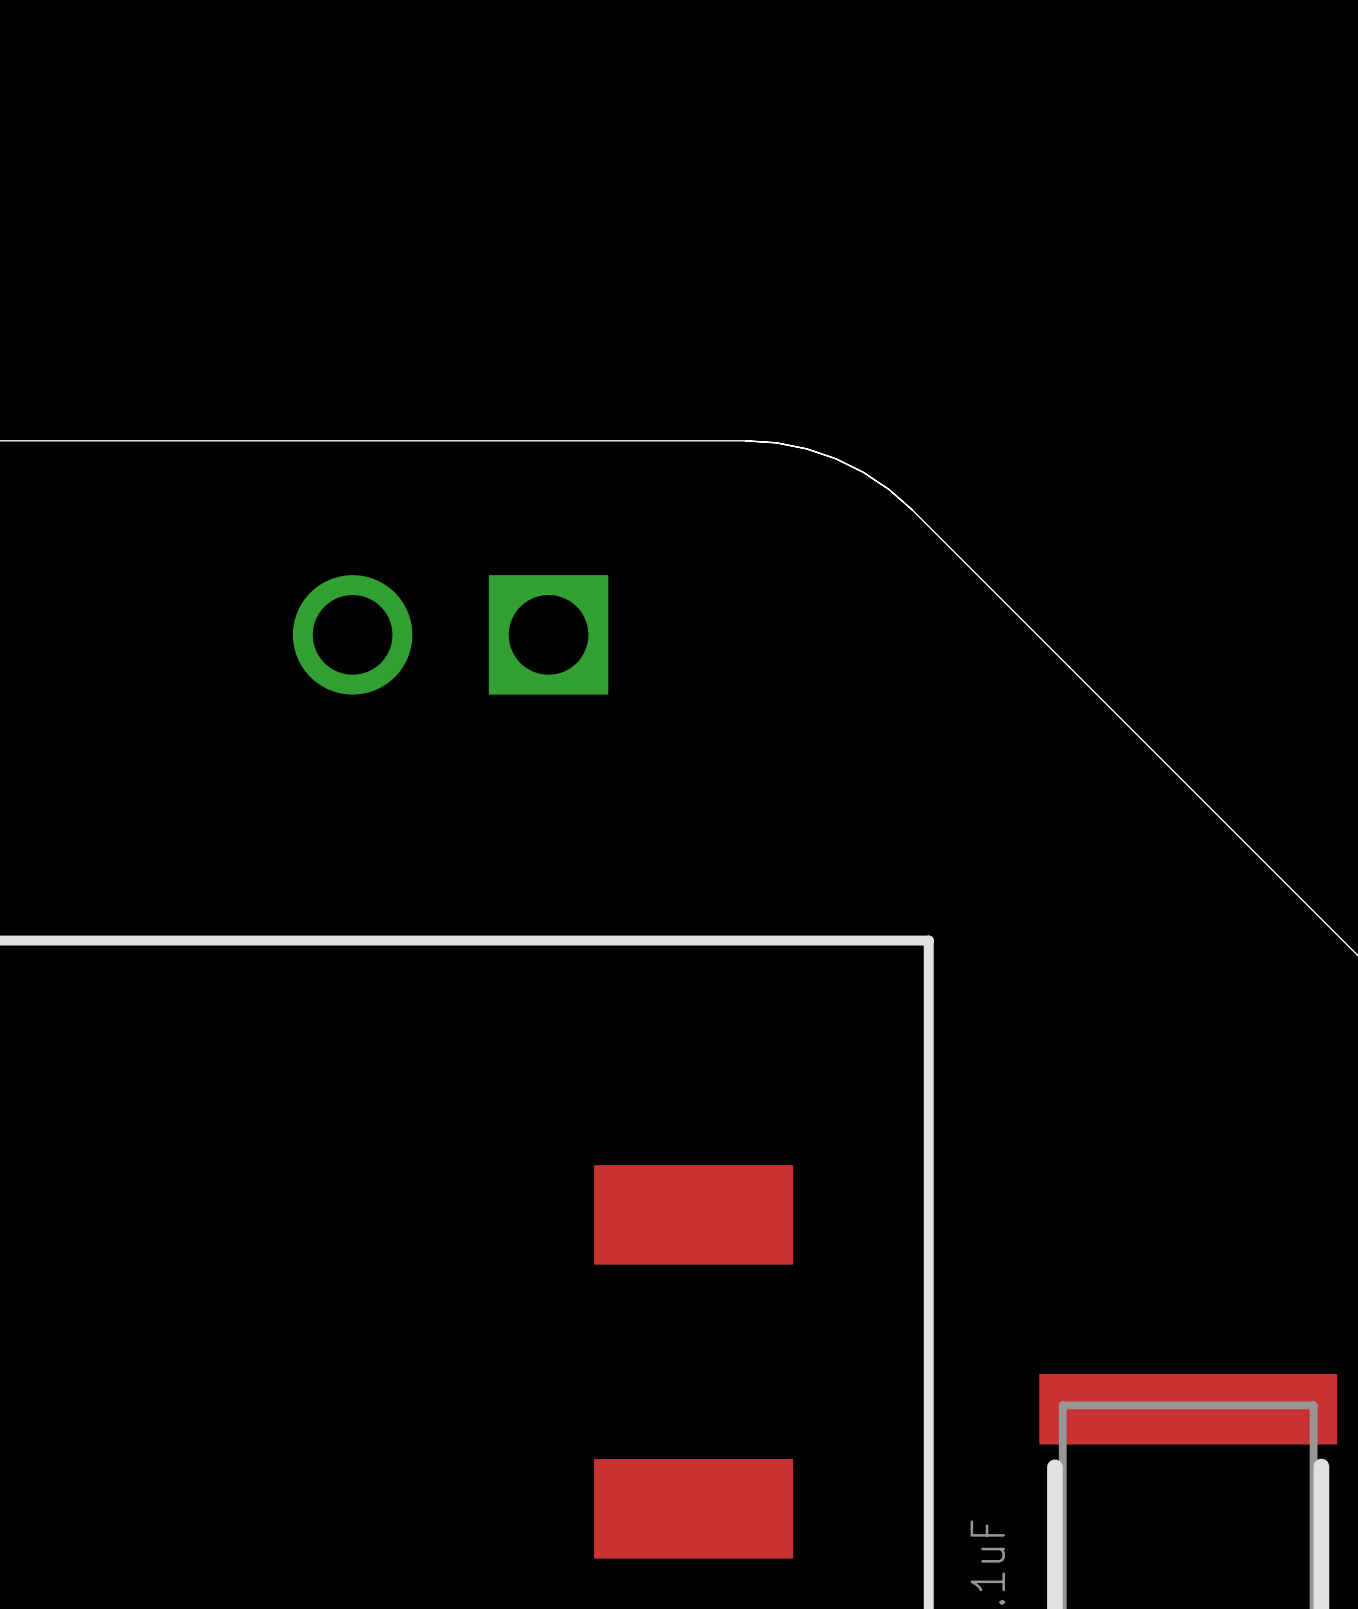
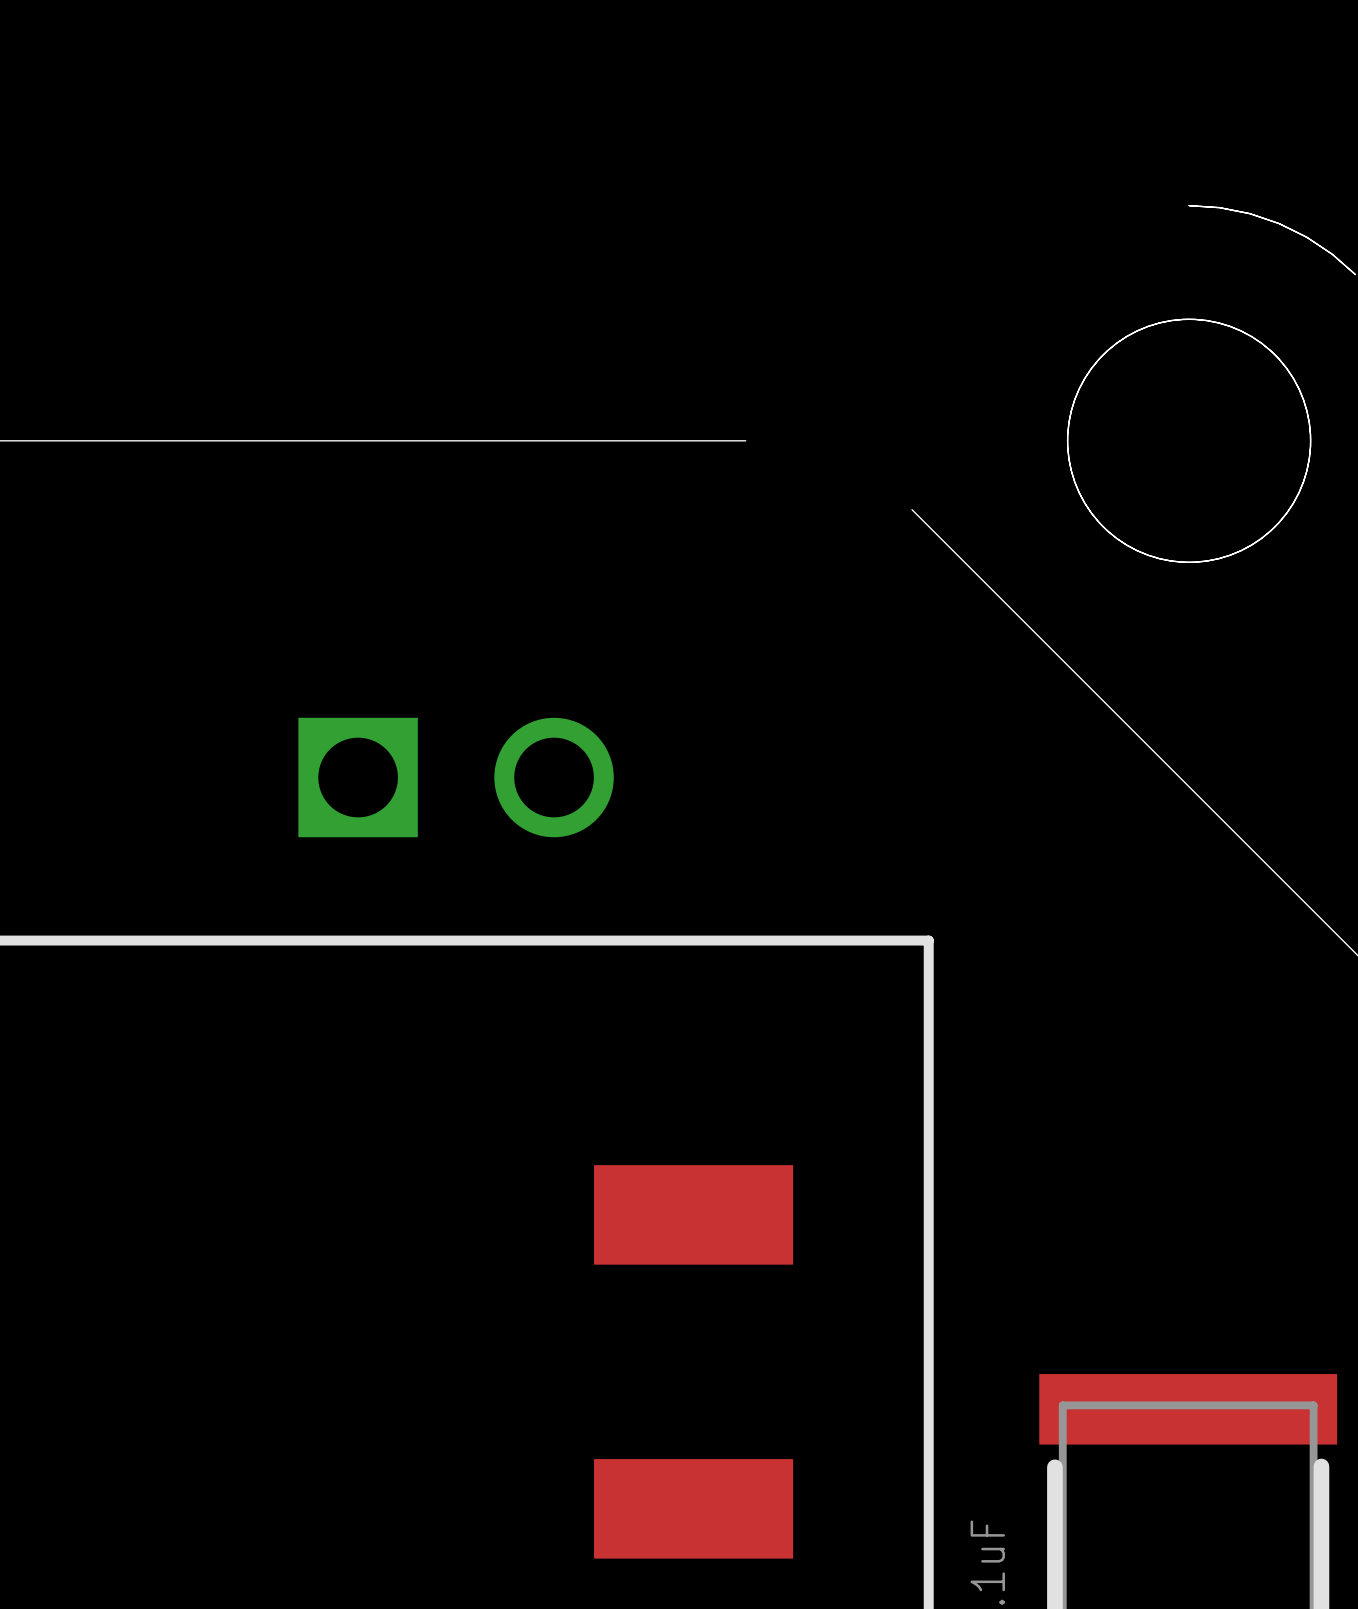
round board edge: none -> [1067, 318, 1311, 563]
board edge: (745, 440) (776, 442) (806, 448) (835, 458) (863, 472) (888, 489) (912, 509) (888, 489) (863, 472) (835, 458) (806, 448) (776, 442) (745, 440) -> (1189, 205) (1219, 207) (1249, 213) (1279, 223) (1306, 237) (1332, 254) (1355, 274) (1332, 254) (1306, 237) (1279, 223) (1249, 213) (1219, 207) (1189, 205)
part rotation: 0° (450, 634) -> 180° (456, 777)

